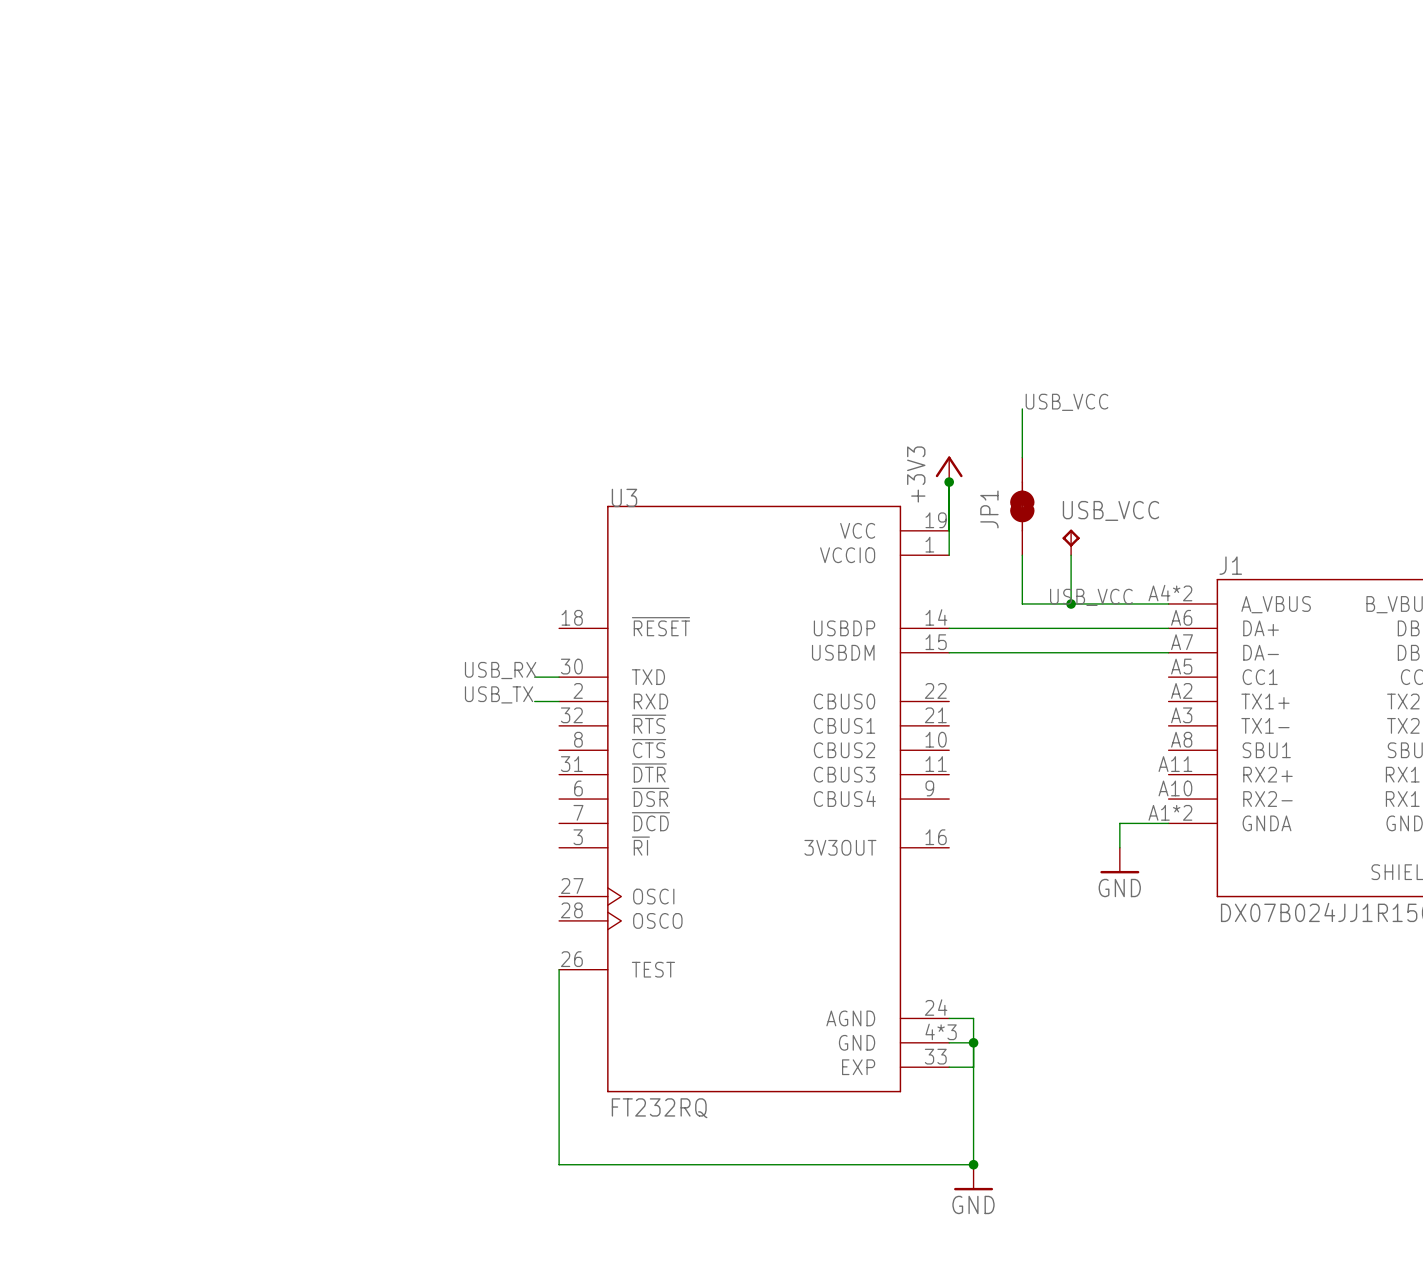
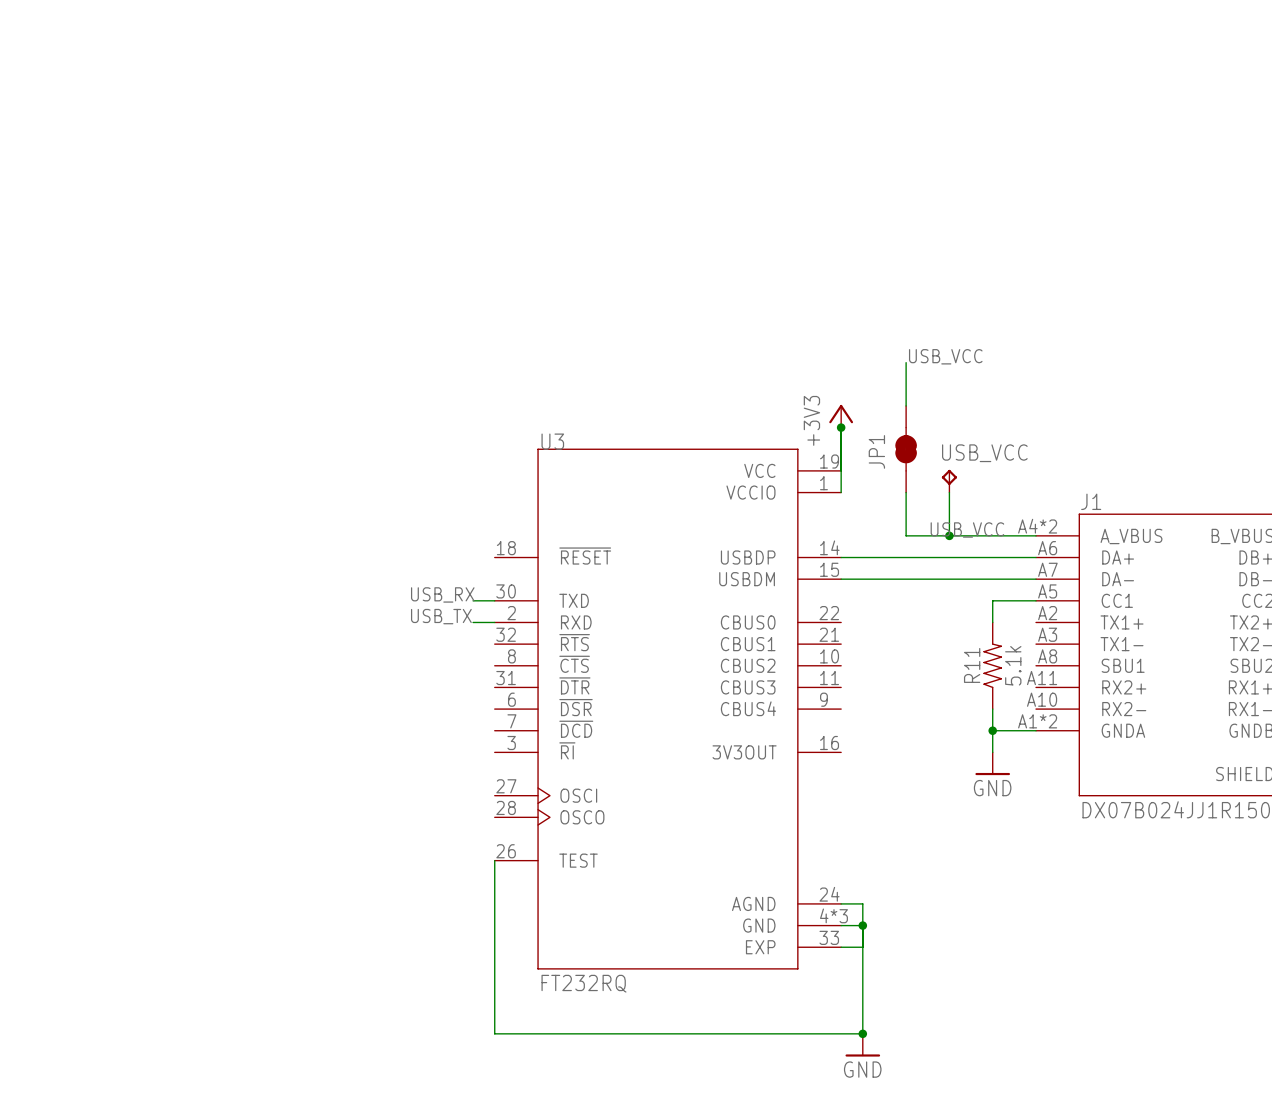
wire: none -> (1036, 600) (992, 600) (992, 622)
R11: none -> 5.1k (992, 665)
wire: none -> (992, 709) (992, 730)
junction: none -> (992, 730)

